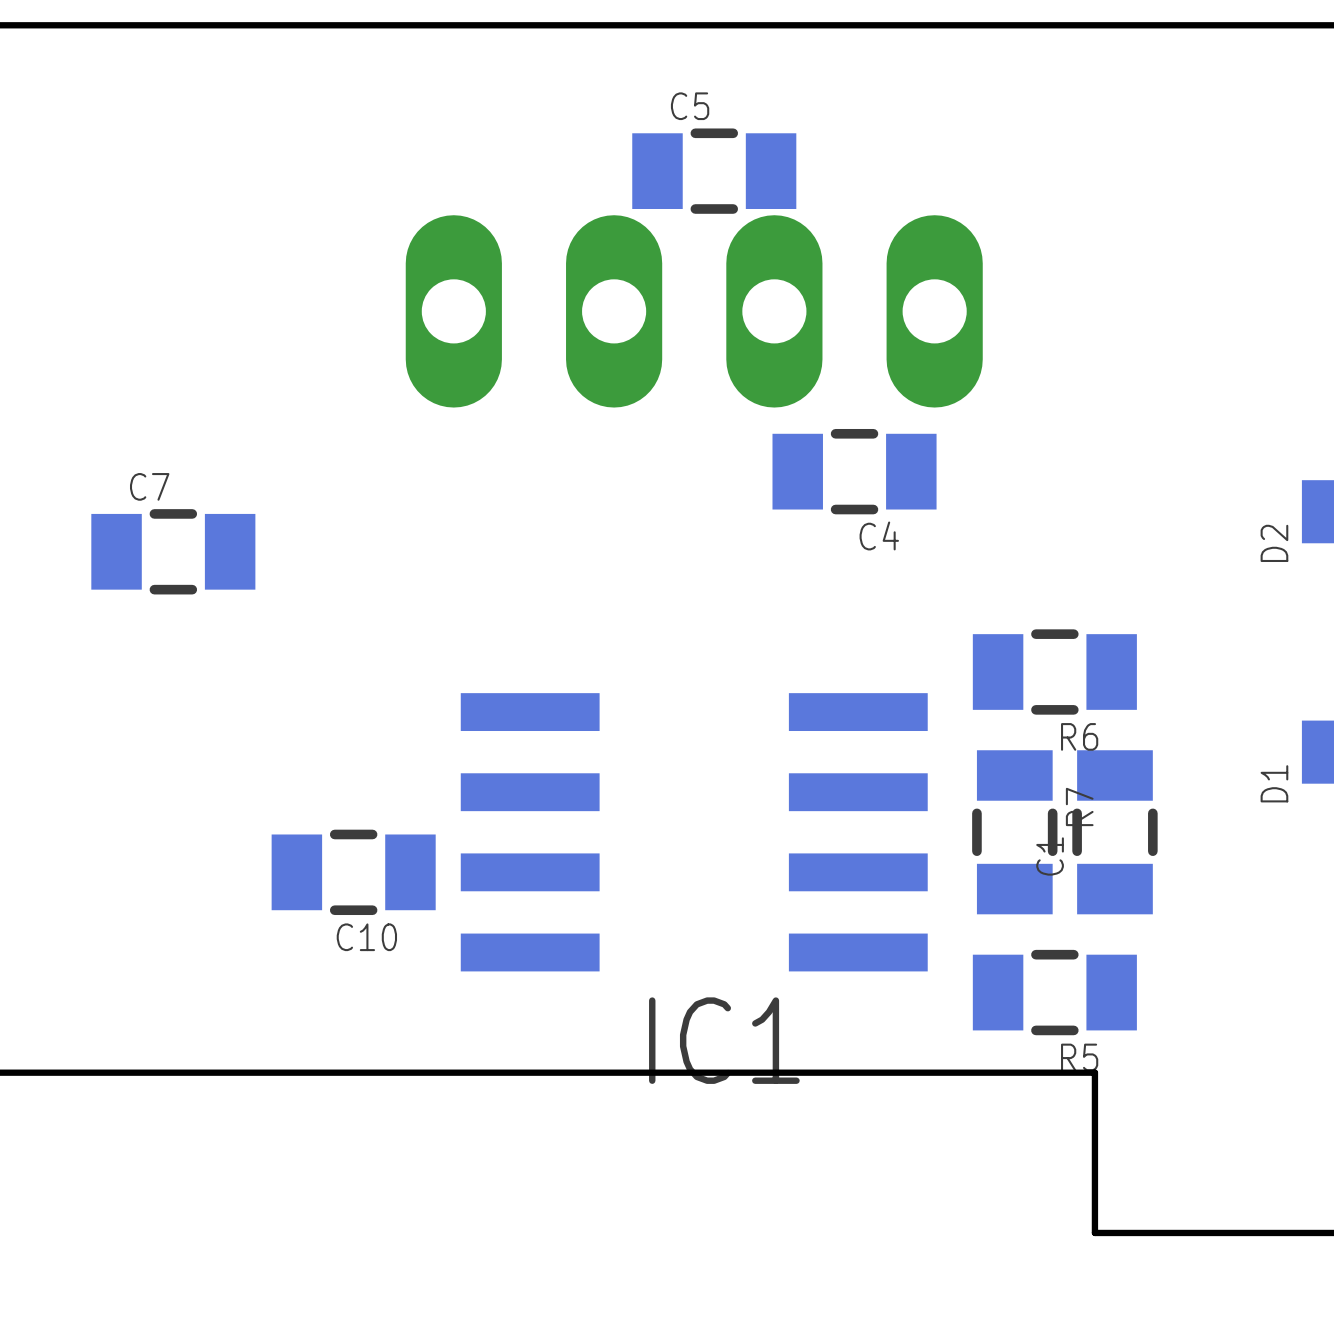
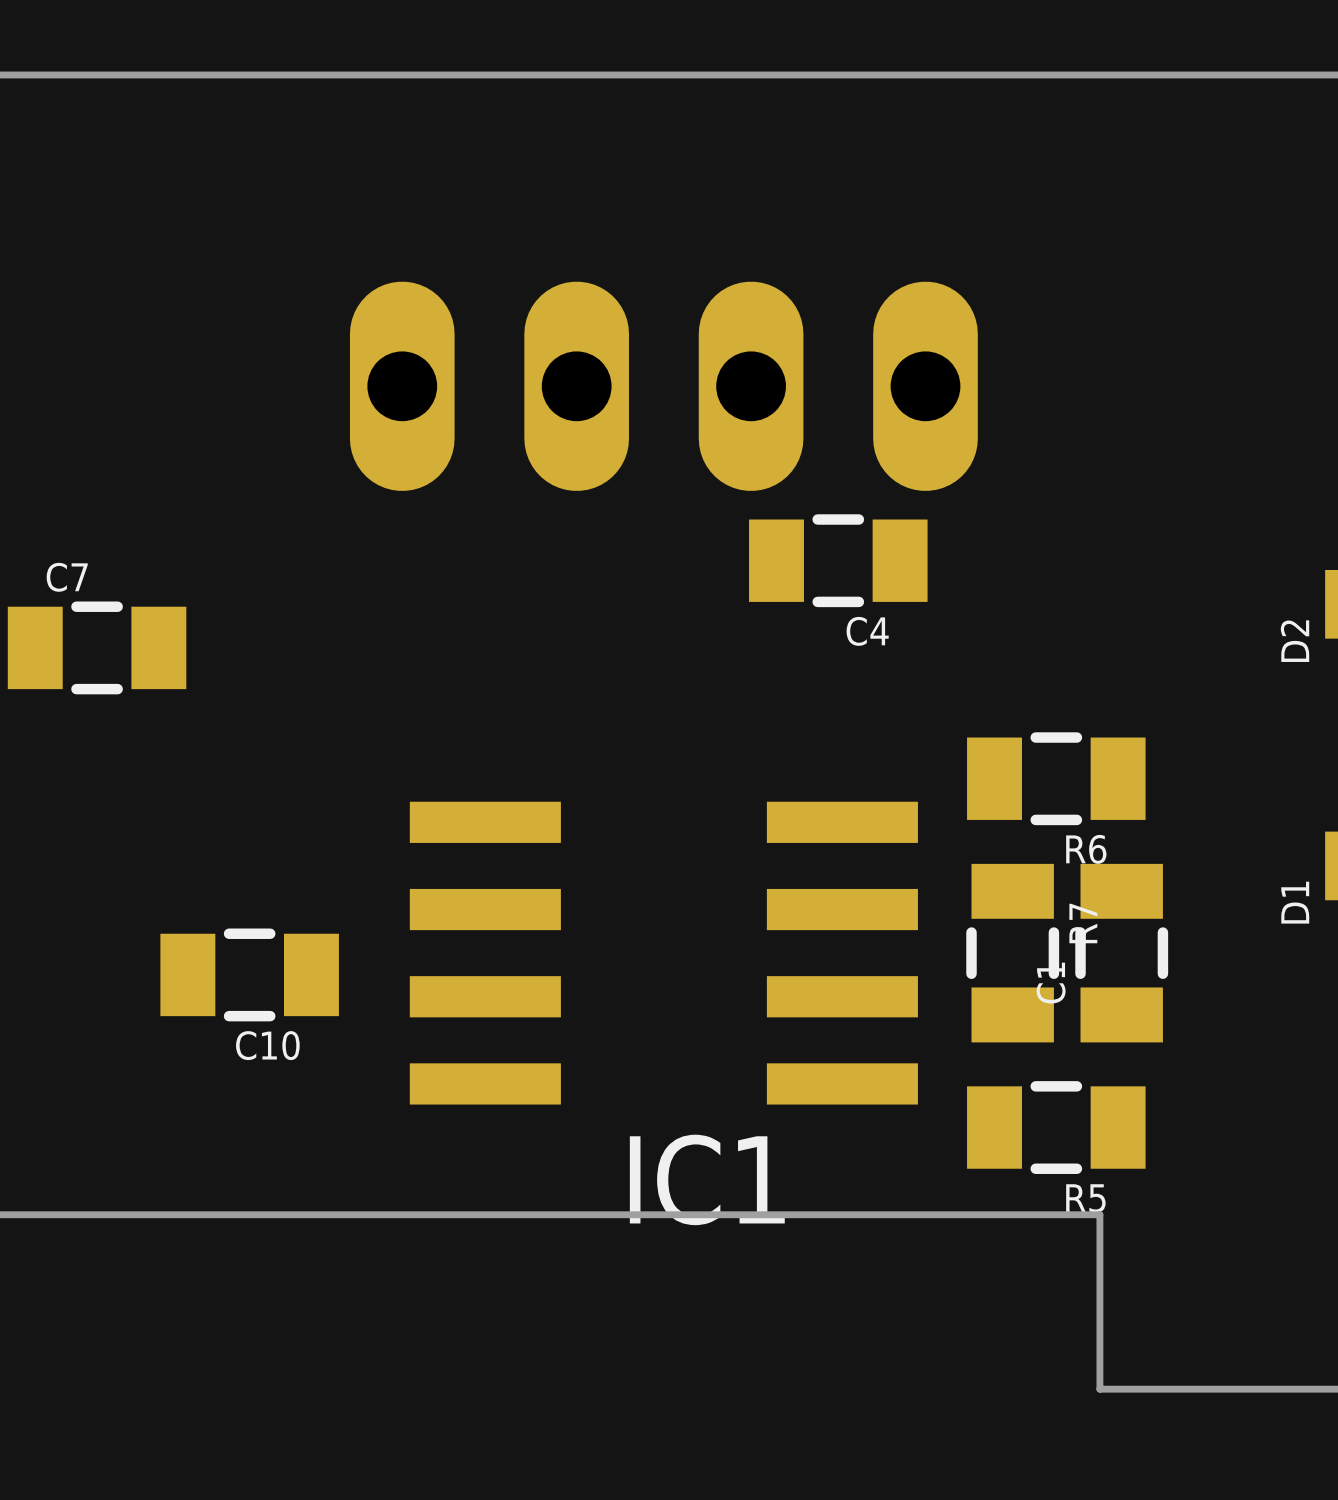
C5: (714, 171) -> none
C10 position: (353, 872) -> (249, 974)

